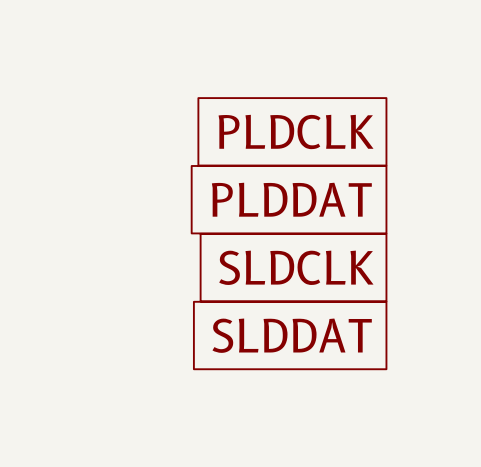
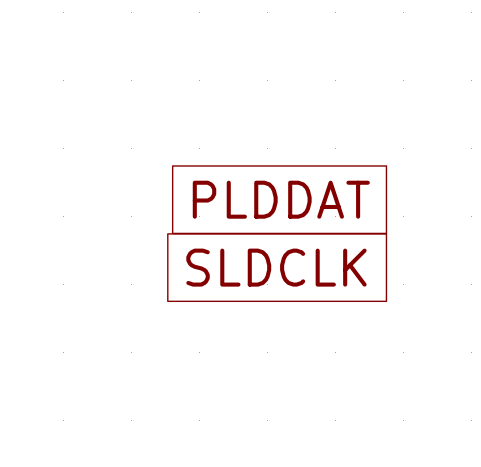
global label: PLDCLK (296, 131) -> none
global label: SLDDAT (292, 335) -> none

